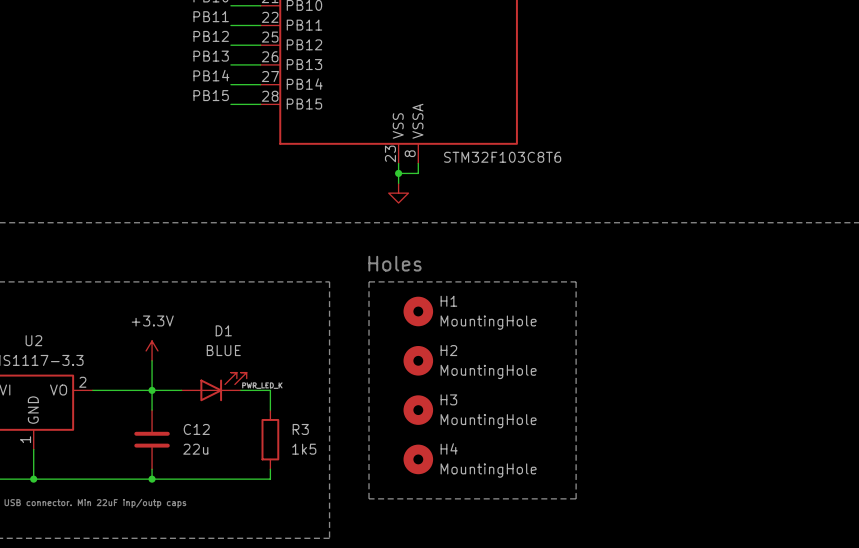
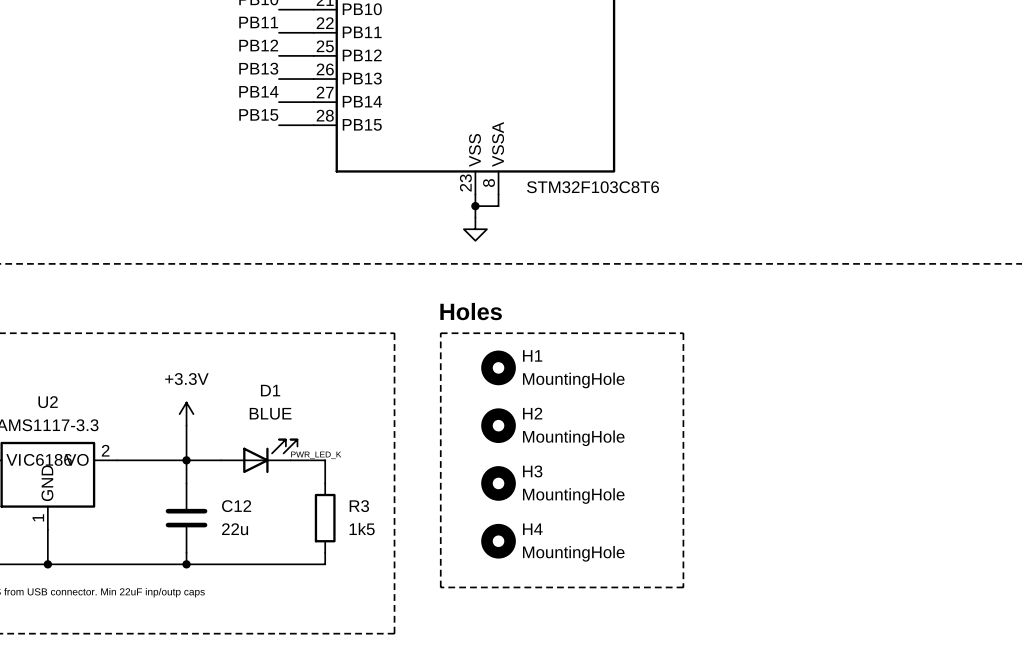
U2 text: none -> C6186 (47, 459)

